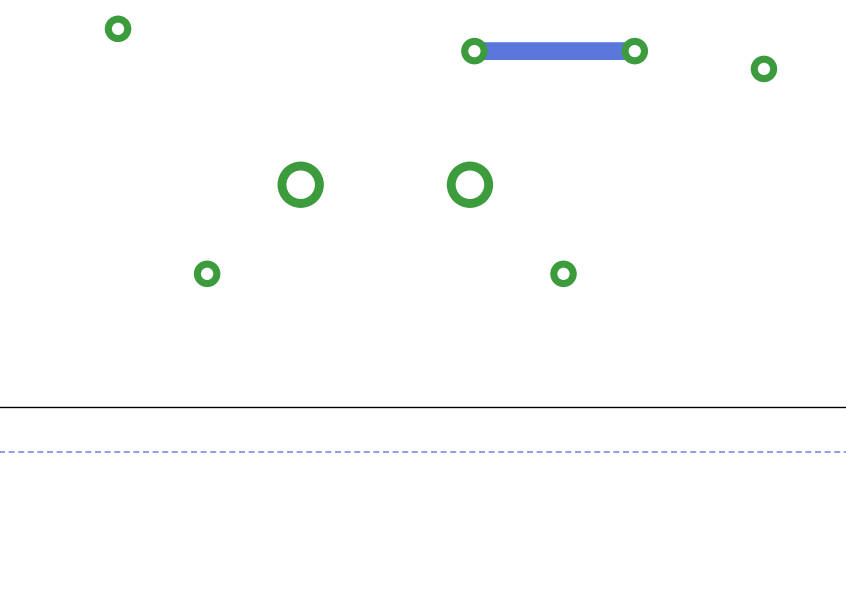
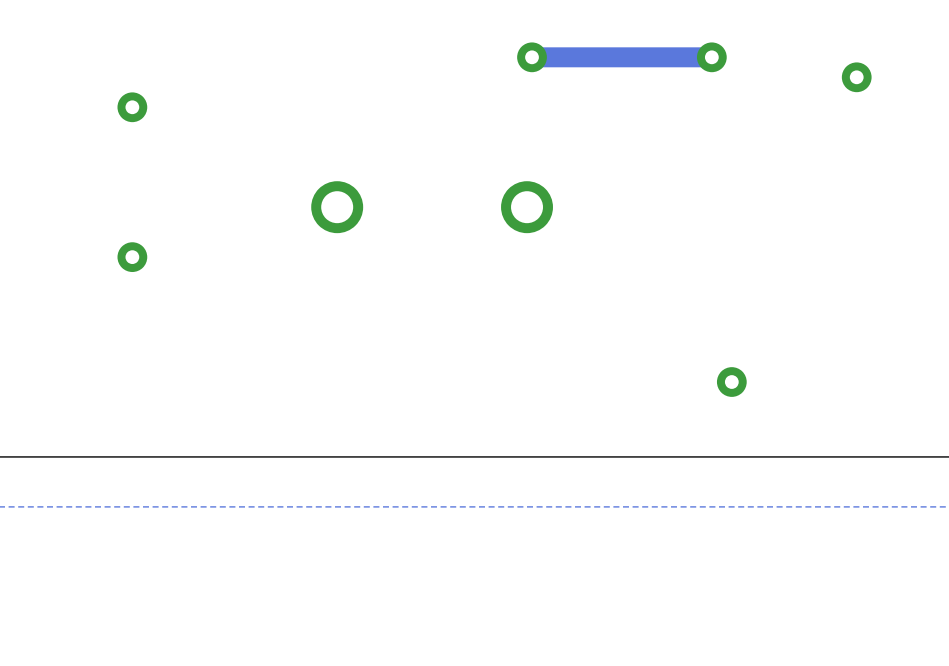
via position: (118, 28) -> (132, 107)
via: none -> (132, 257)
via: (207, 273) -> none
via position: (563, 273) -> (731, 382)

